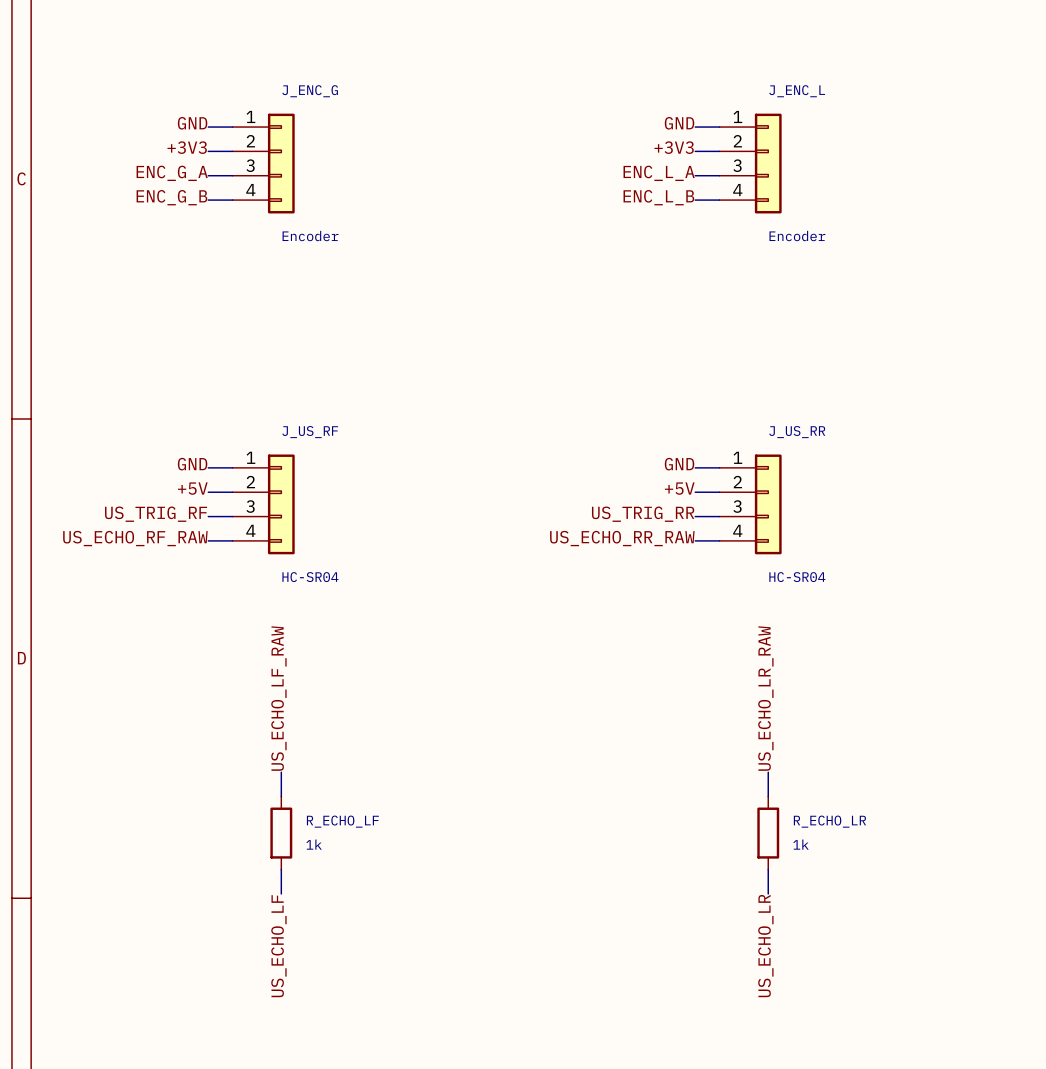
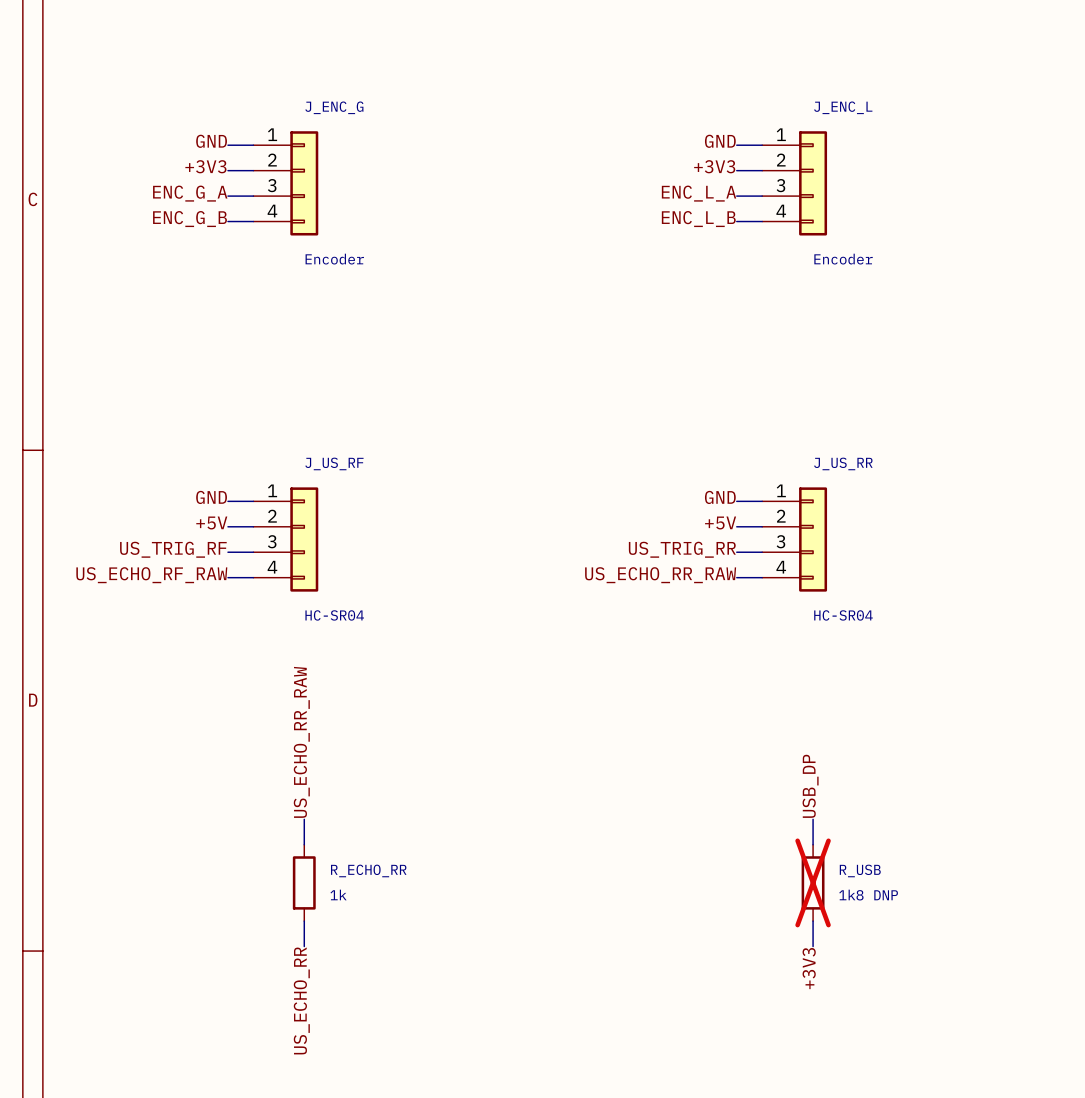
label: US_ECHO_LF_RAW (278, 698) -> US_ECHO_RR_RAW (301, 742)
label: US_ECHO_LR_RAW (765, 698) -> USB_DP (810, 786)
R_ECHO_LF name: R_ECHO_LF (342, 821) -> R_ECHO_RR (368, 870)
R_ECHO_LR name: R_ECHO_LR (829, 821) -> R_USB (860, 870)
R_ECHO_LR do-not-place cross: none -> (813, 882)
R_ECHO_LR value: 1k (801, 844) -> 1k8 DNP (868, 895)
label: US_ECHO_LF (278, 946) -> US_ECHO_RR (301, 1000)
label: US_ECHO_LR (765, 946) -> +3V3 (809, 968)

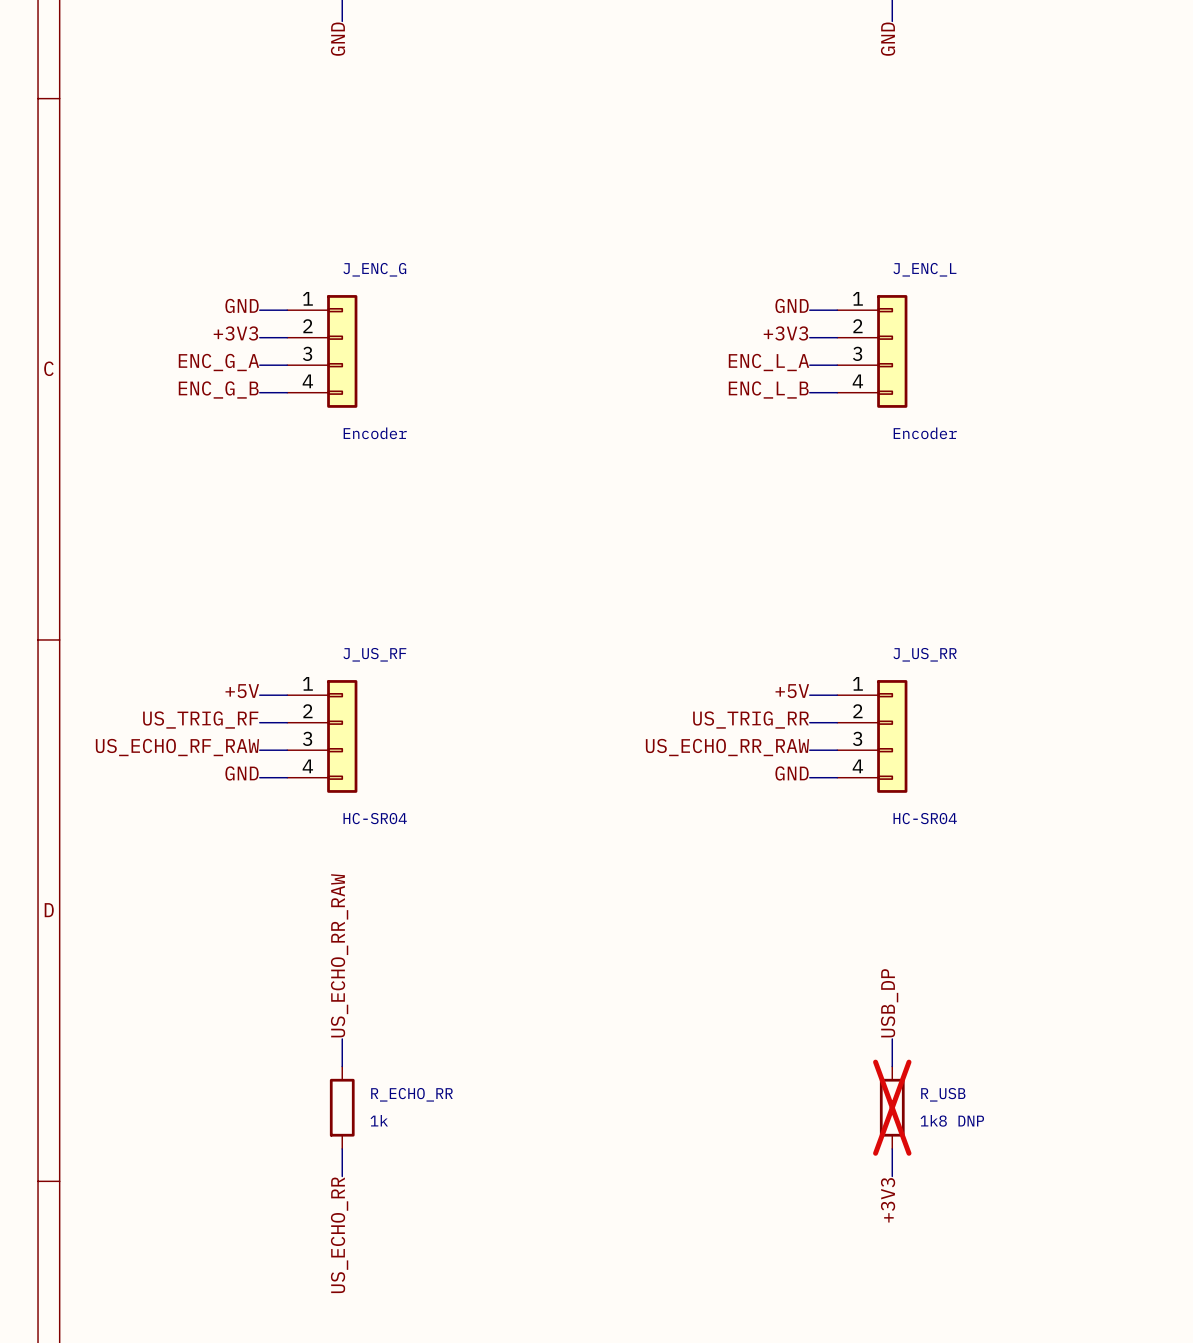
label: GND (211, 497) -> +5V (242, 691)
label: GND (720, 497) -> +5V (792, 691)
label: +5V (211, 522) -> US_TRIG_RF (200, 720)
label: +5V (720, 522) -> US_TRIG_RR (750, 720)
label: US_TRIG_RF (173, 549) -> US_ECHO_RF_RAW (177, 747)
label: US_TRIG_RR (682, 549) -> US_ECHO_RR_RAW (727, 747)
label: US_ECHO_RF_RAW (151, 575) -> GND (242, 773)
label: US_ECHO_RR_RAW (660, 575) -> GND (792, 773)

